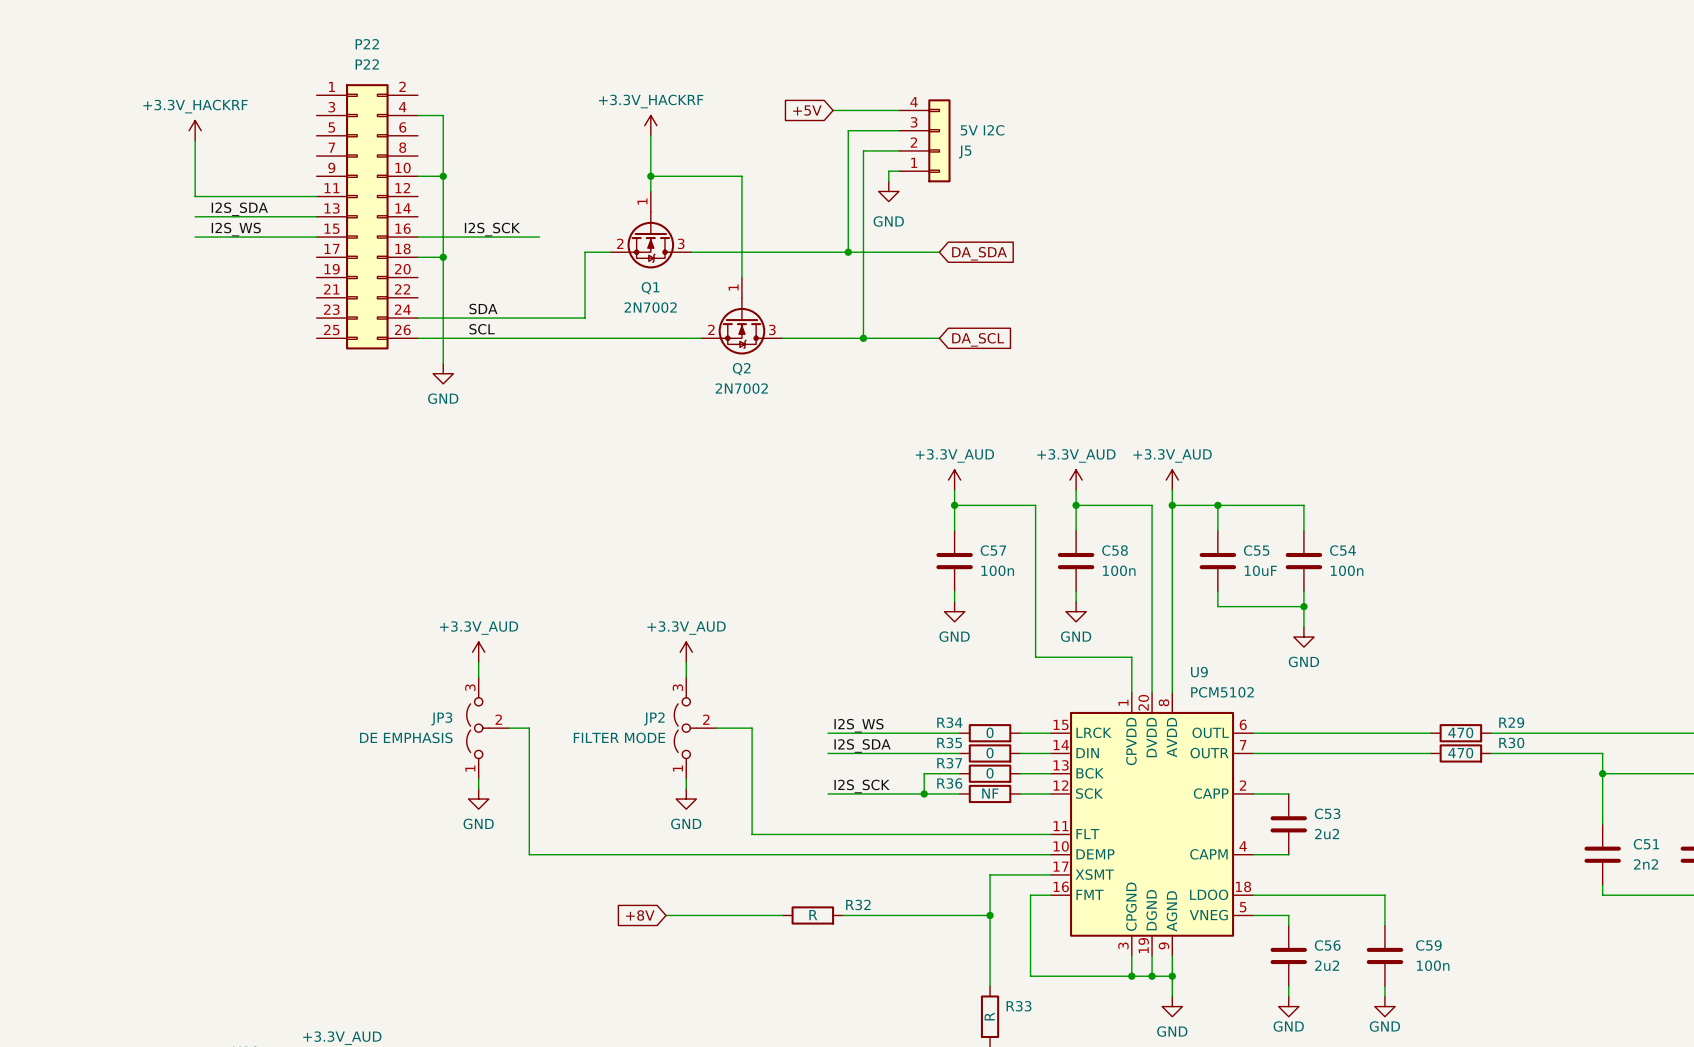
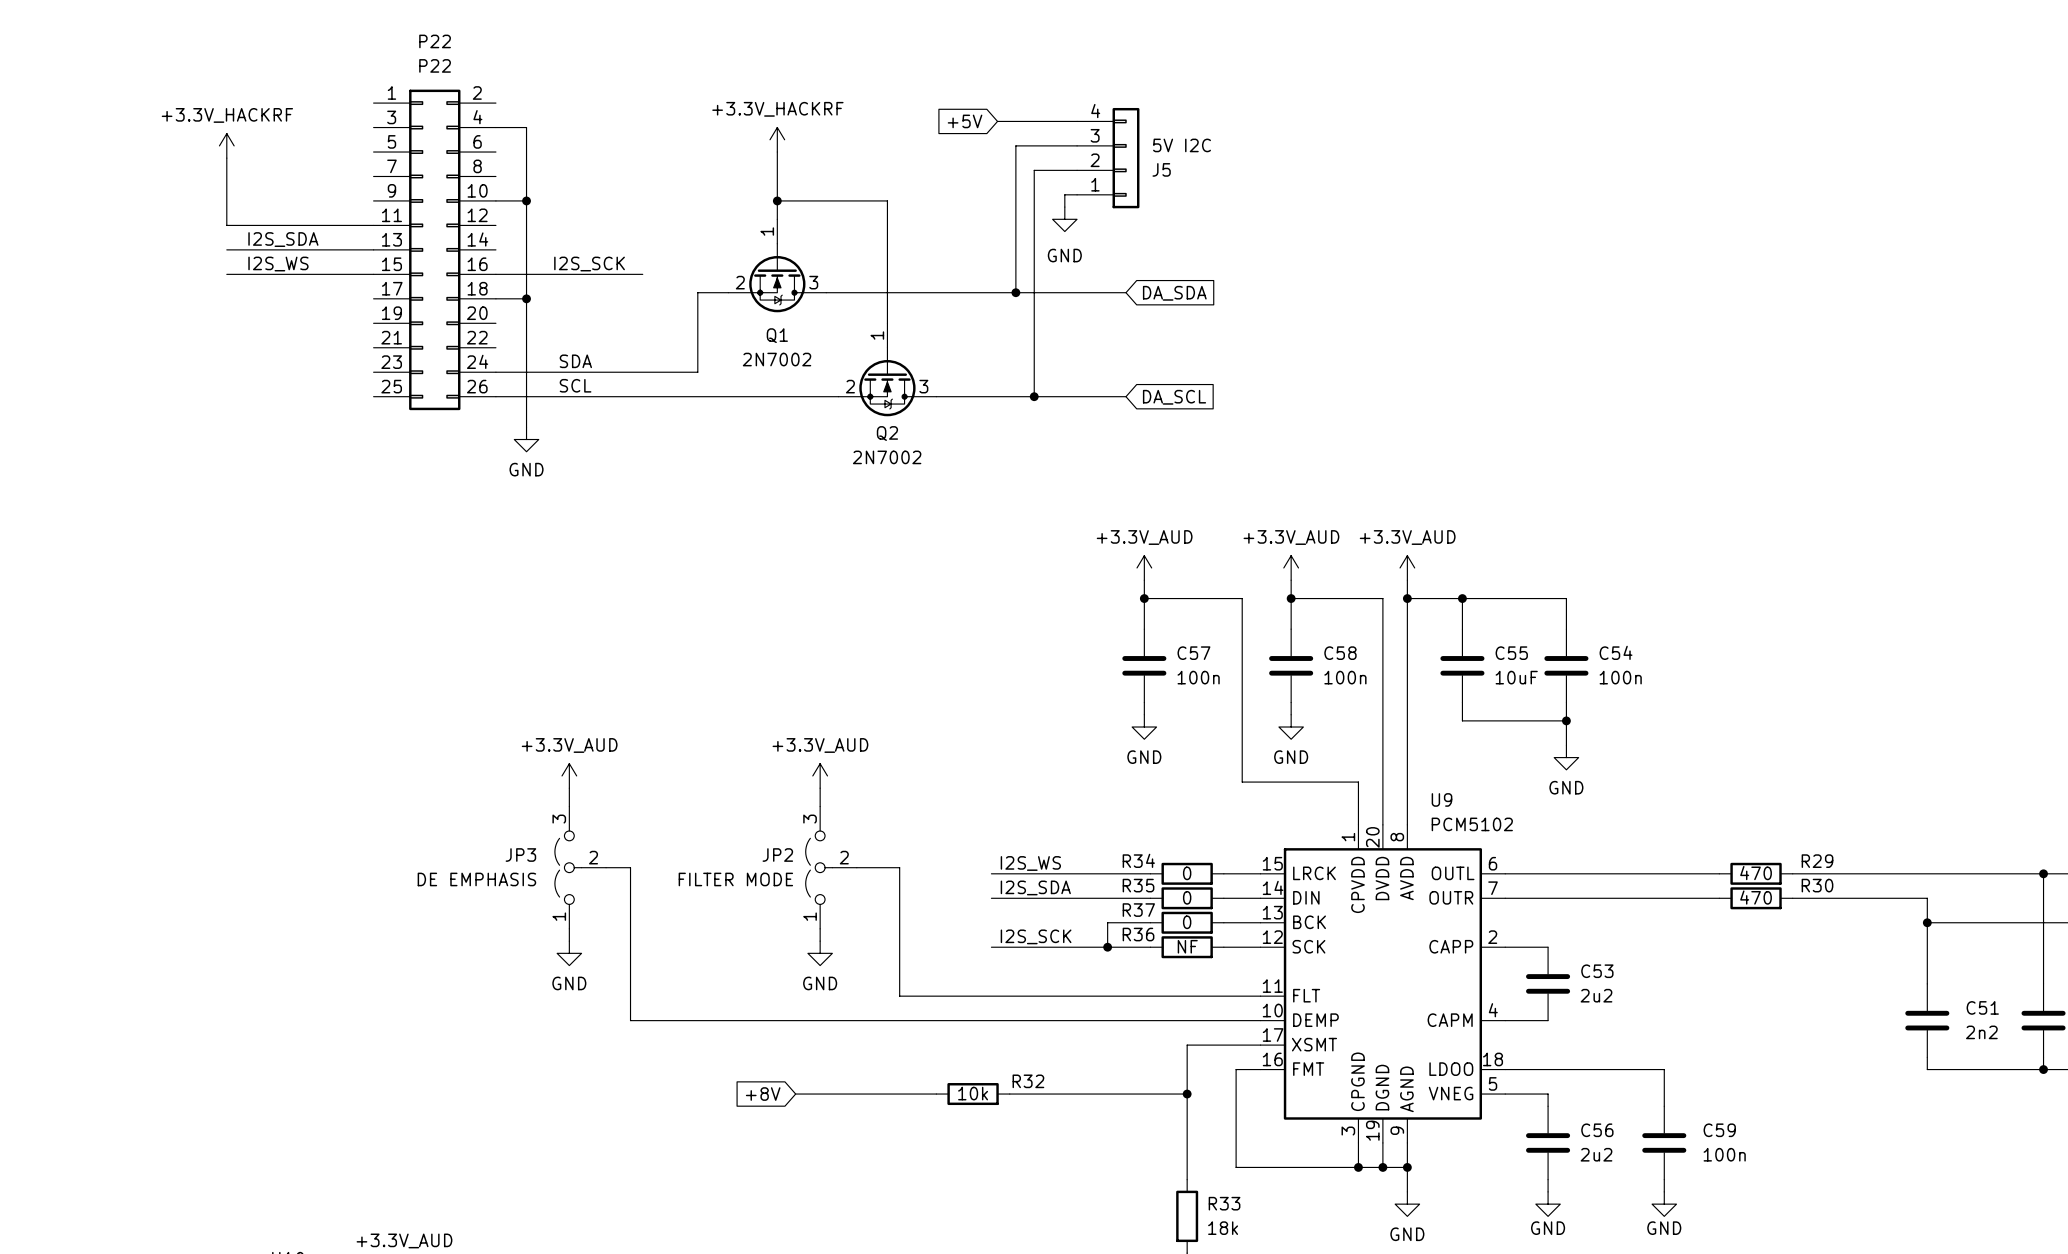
R32 value: R (813, 915) -> 10k (973, 1093)
R33 value: R (989, 1016) -> 18k (1223, 1228)

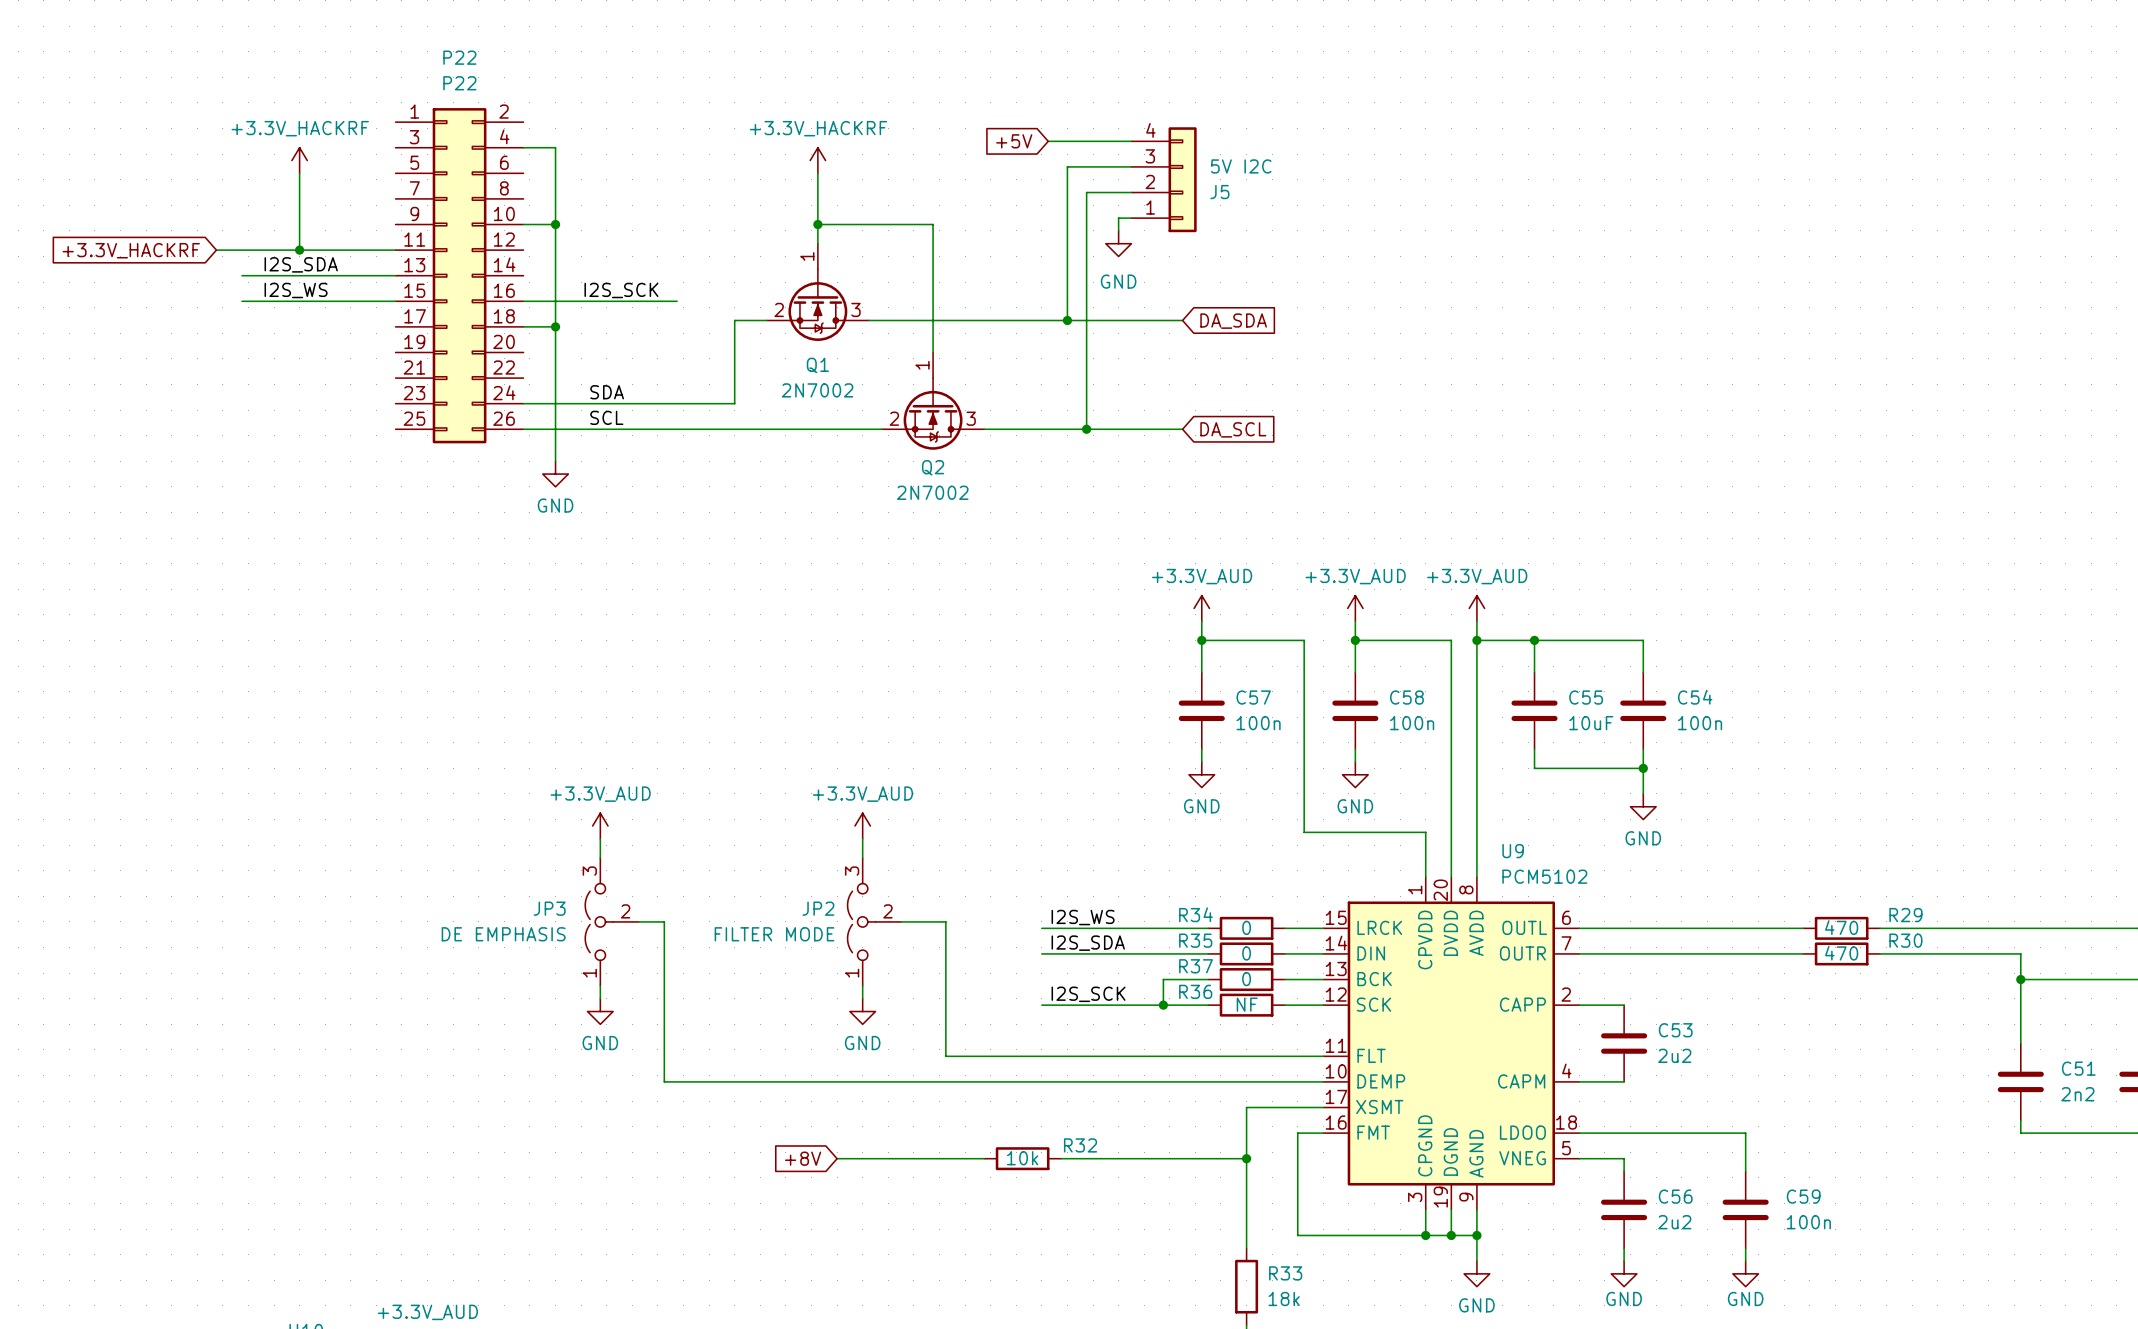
power symbol position: +3.3V_HACKRF (226, 145) -> +3.3V_HACKRF (299, 160)
wire: none -> (299, 173) (299, 250)
wire: (226, 158) (226, 225) -> (216, 250) (242, 250)
junction: none -> (299, 250)
global label: none -> +3.3V_HACKRF (131, 250)

